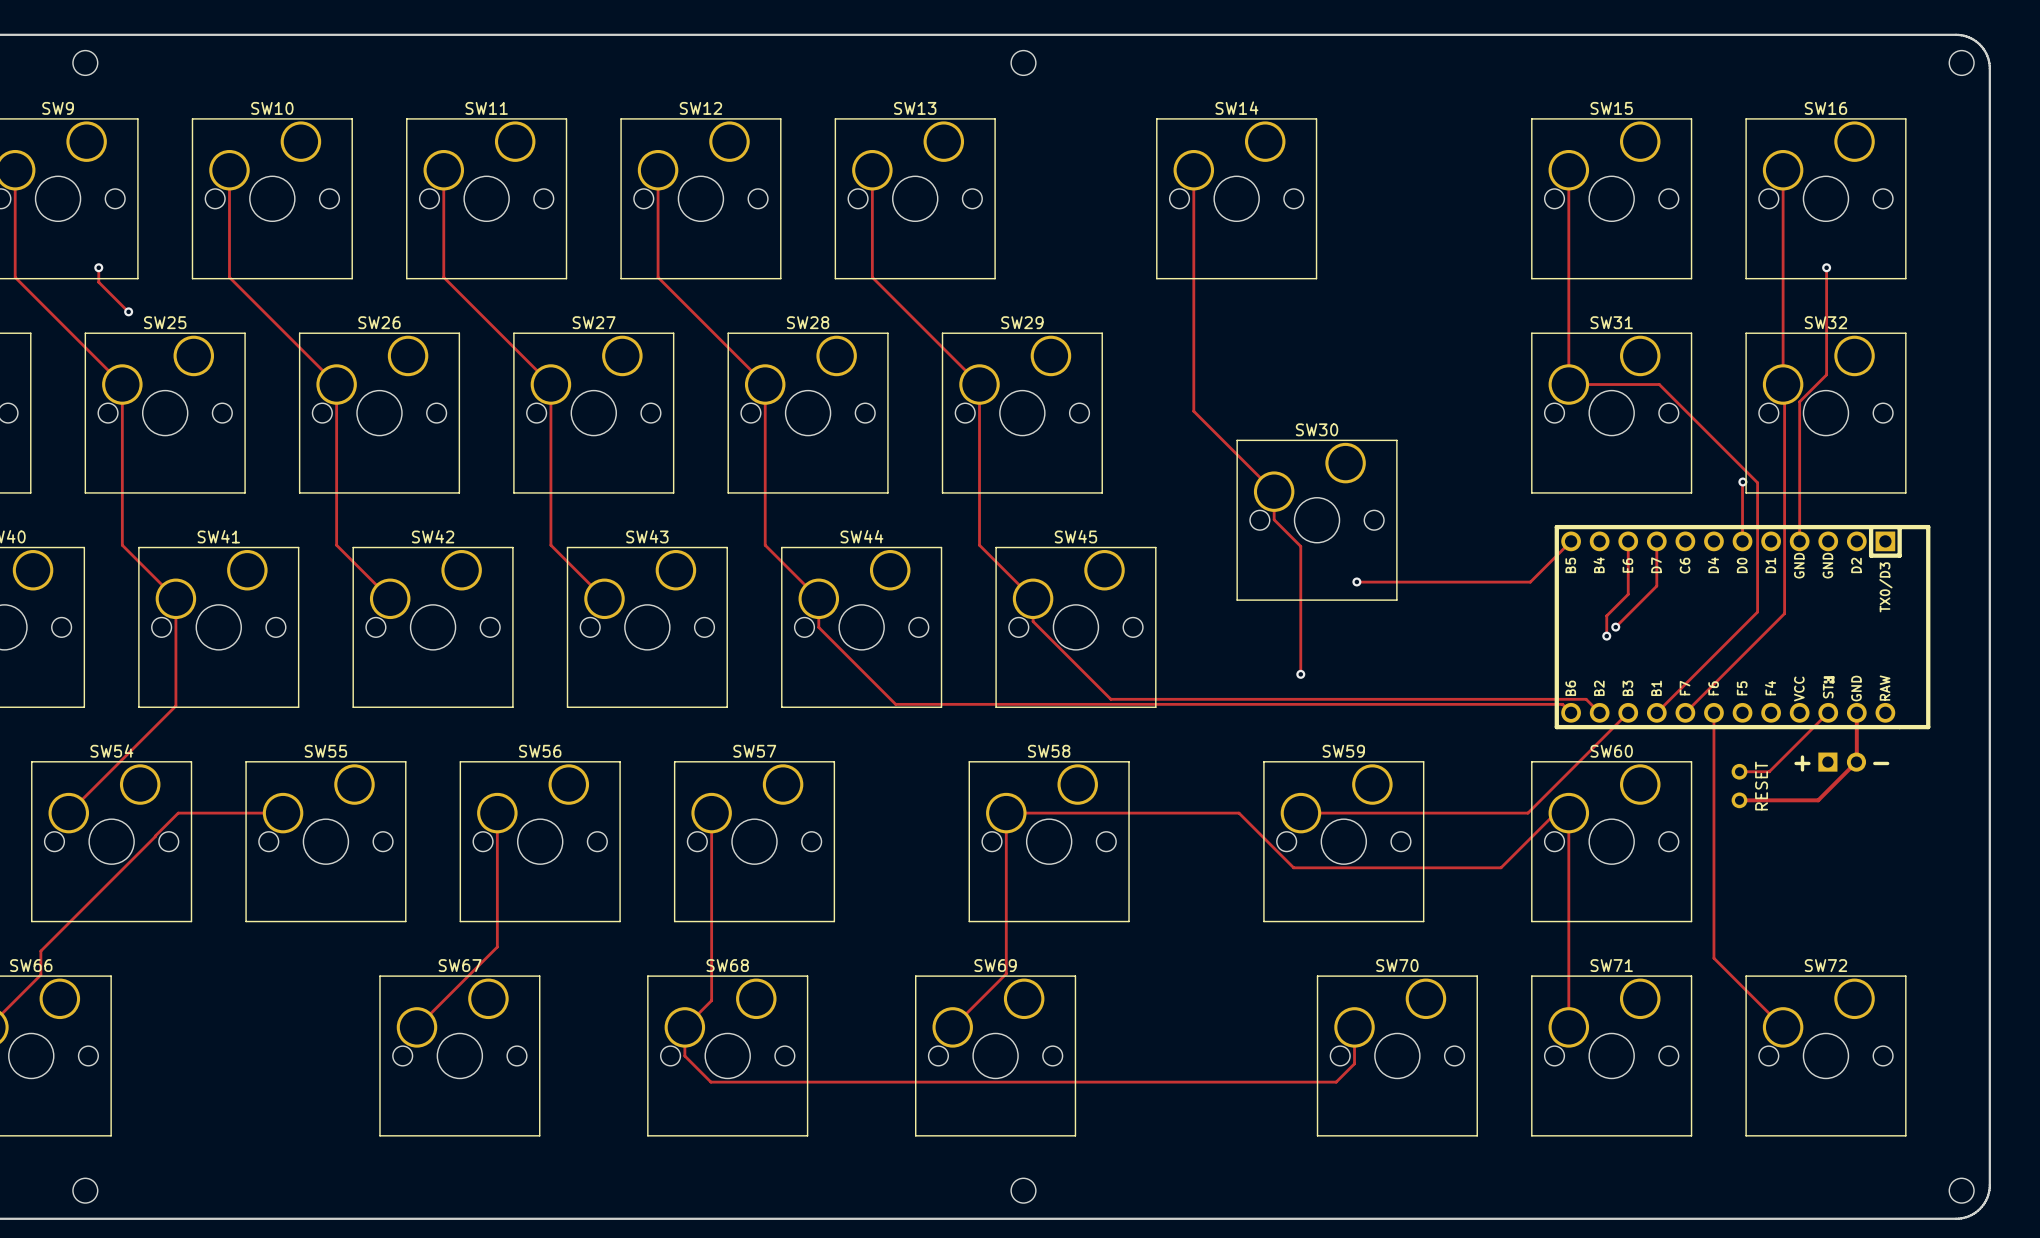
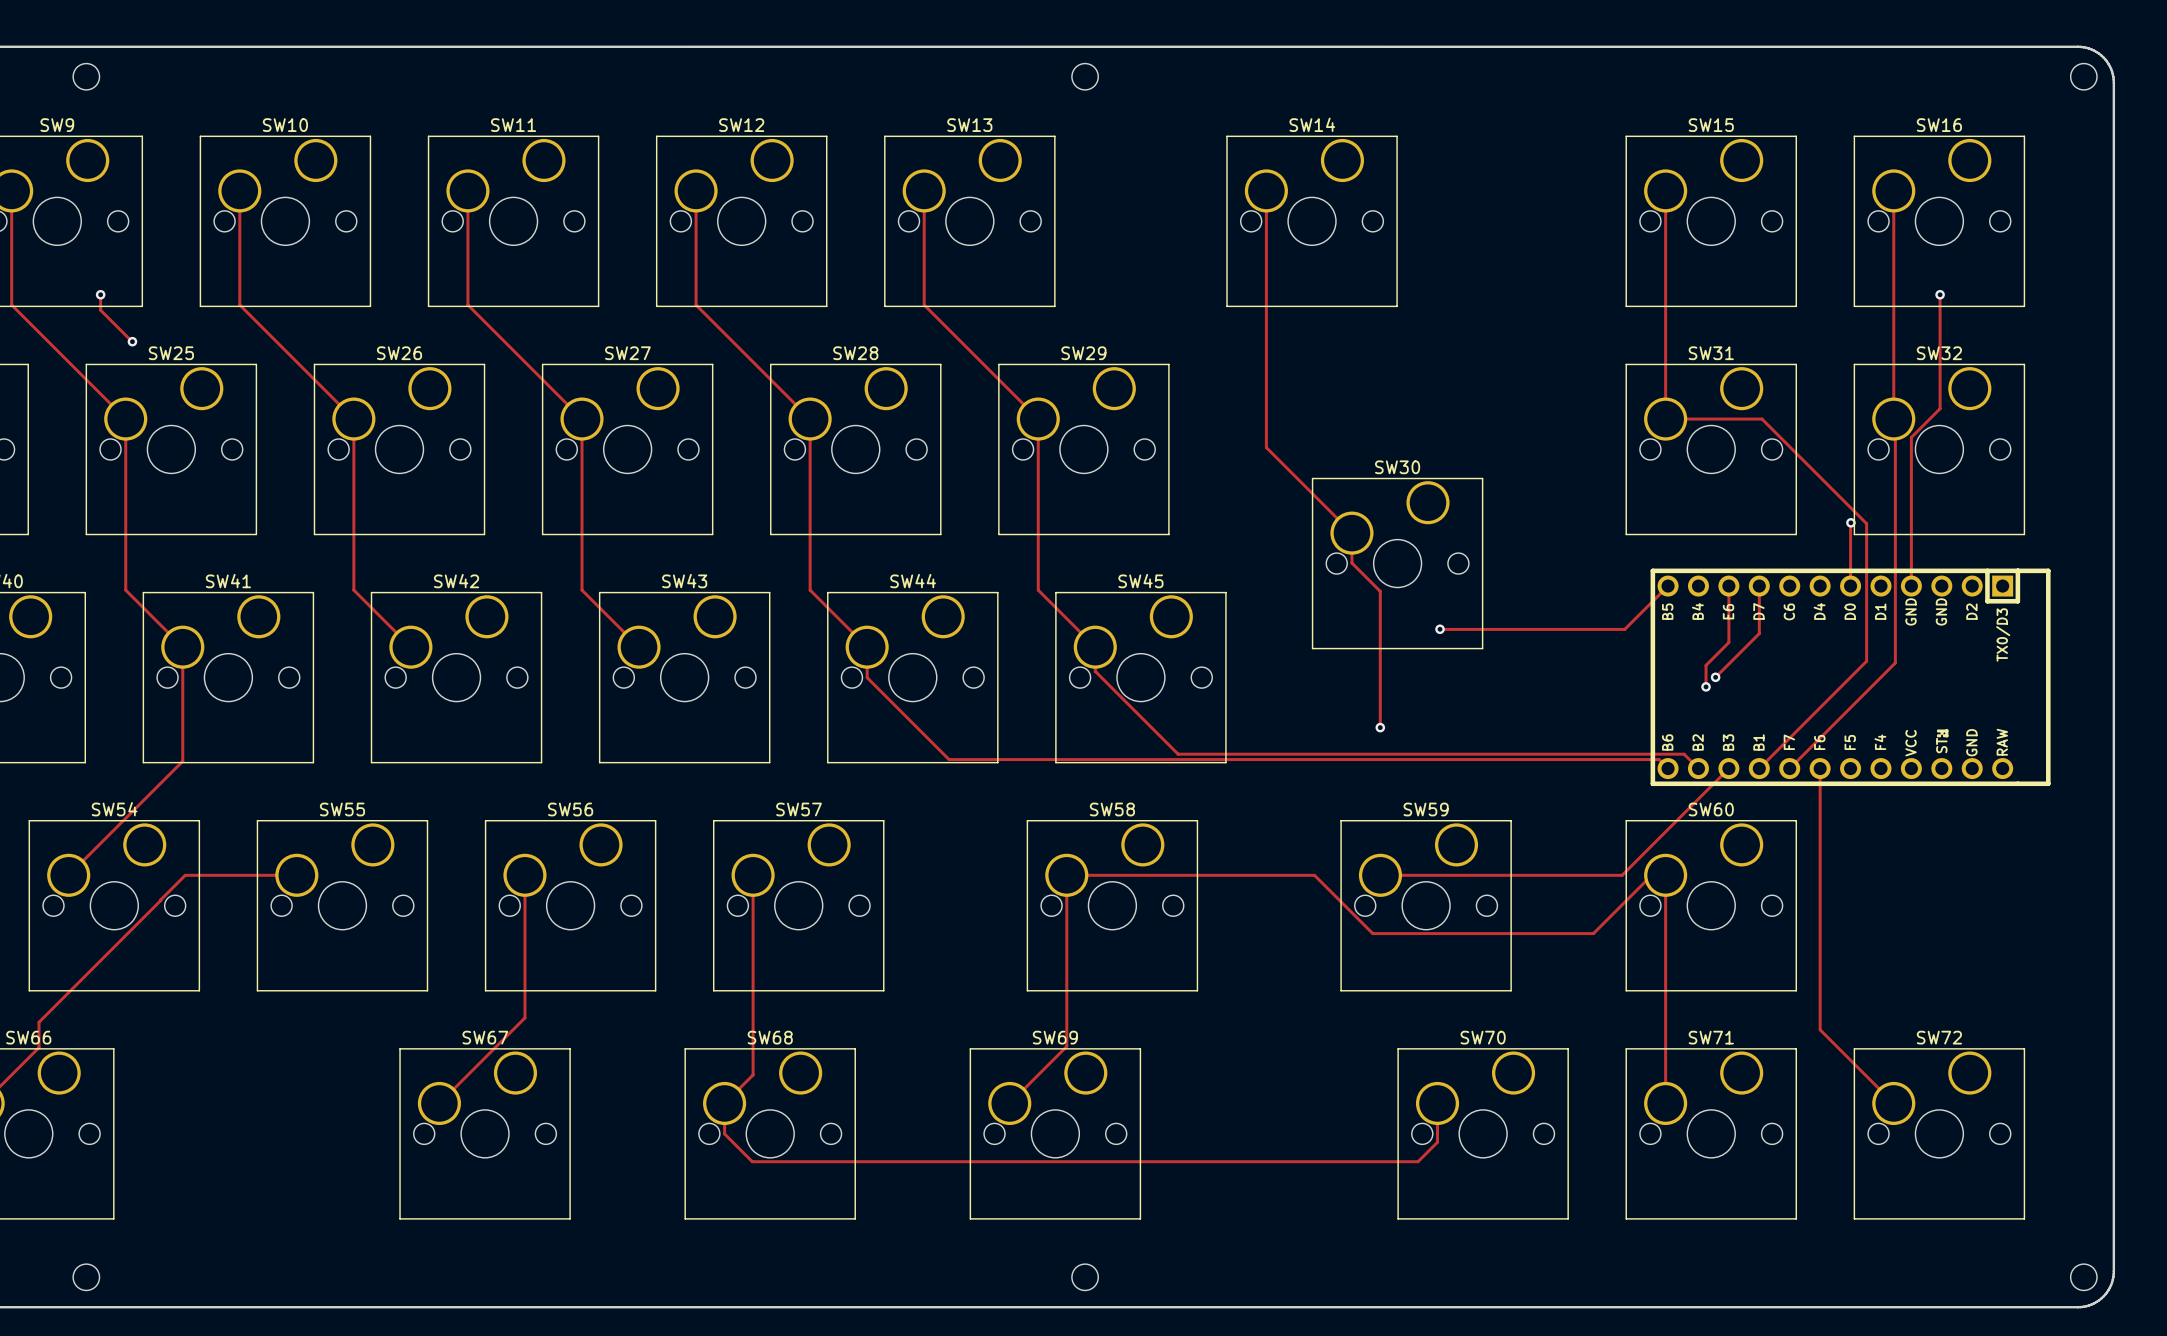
track: (1828, 712) (1769, 771) (1739, 771) -> none
track: (1856, 712) (1856, 761) (1818, 800) (1739, 800) -> none
part: (1842, 762) -> none
text: + (1802, 763) -> none
text: - (1881, 763) -> none
part: (1739, 786) -> none
text: RESET (1761, 786) -> none

